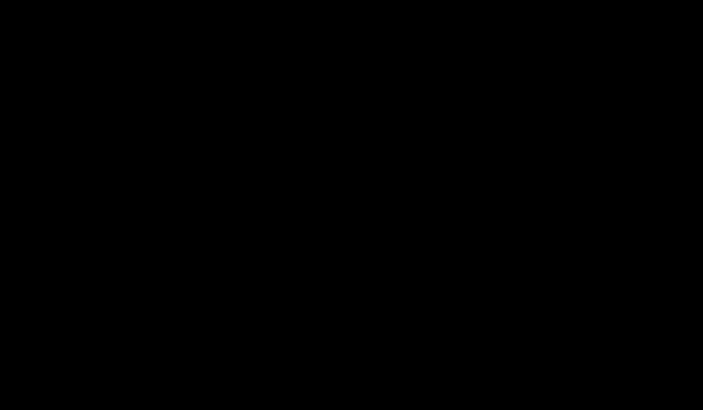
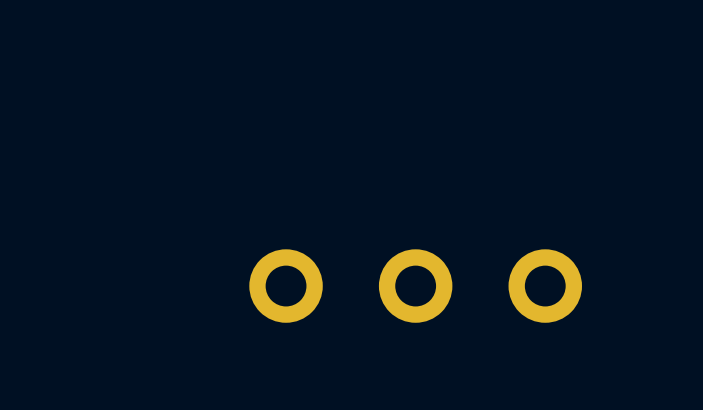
part: none -> (415, 286)

